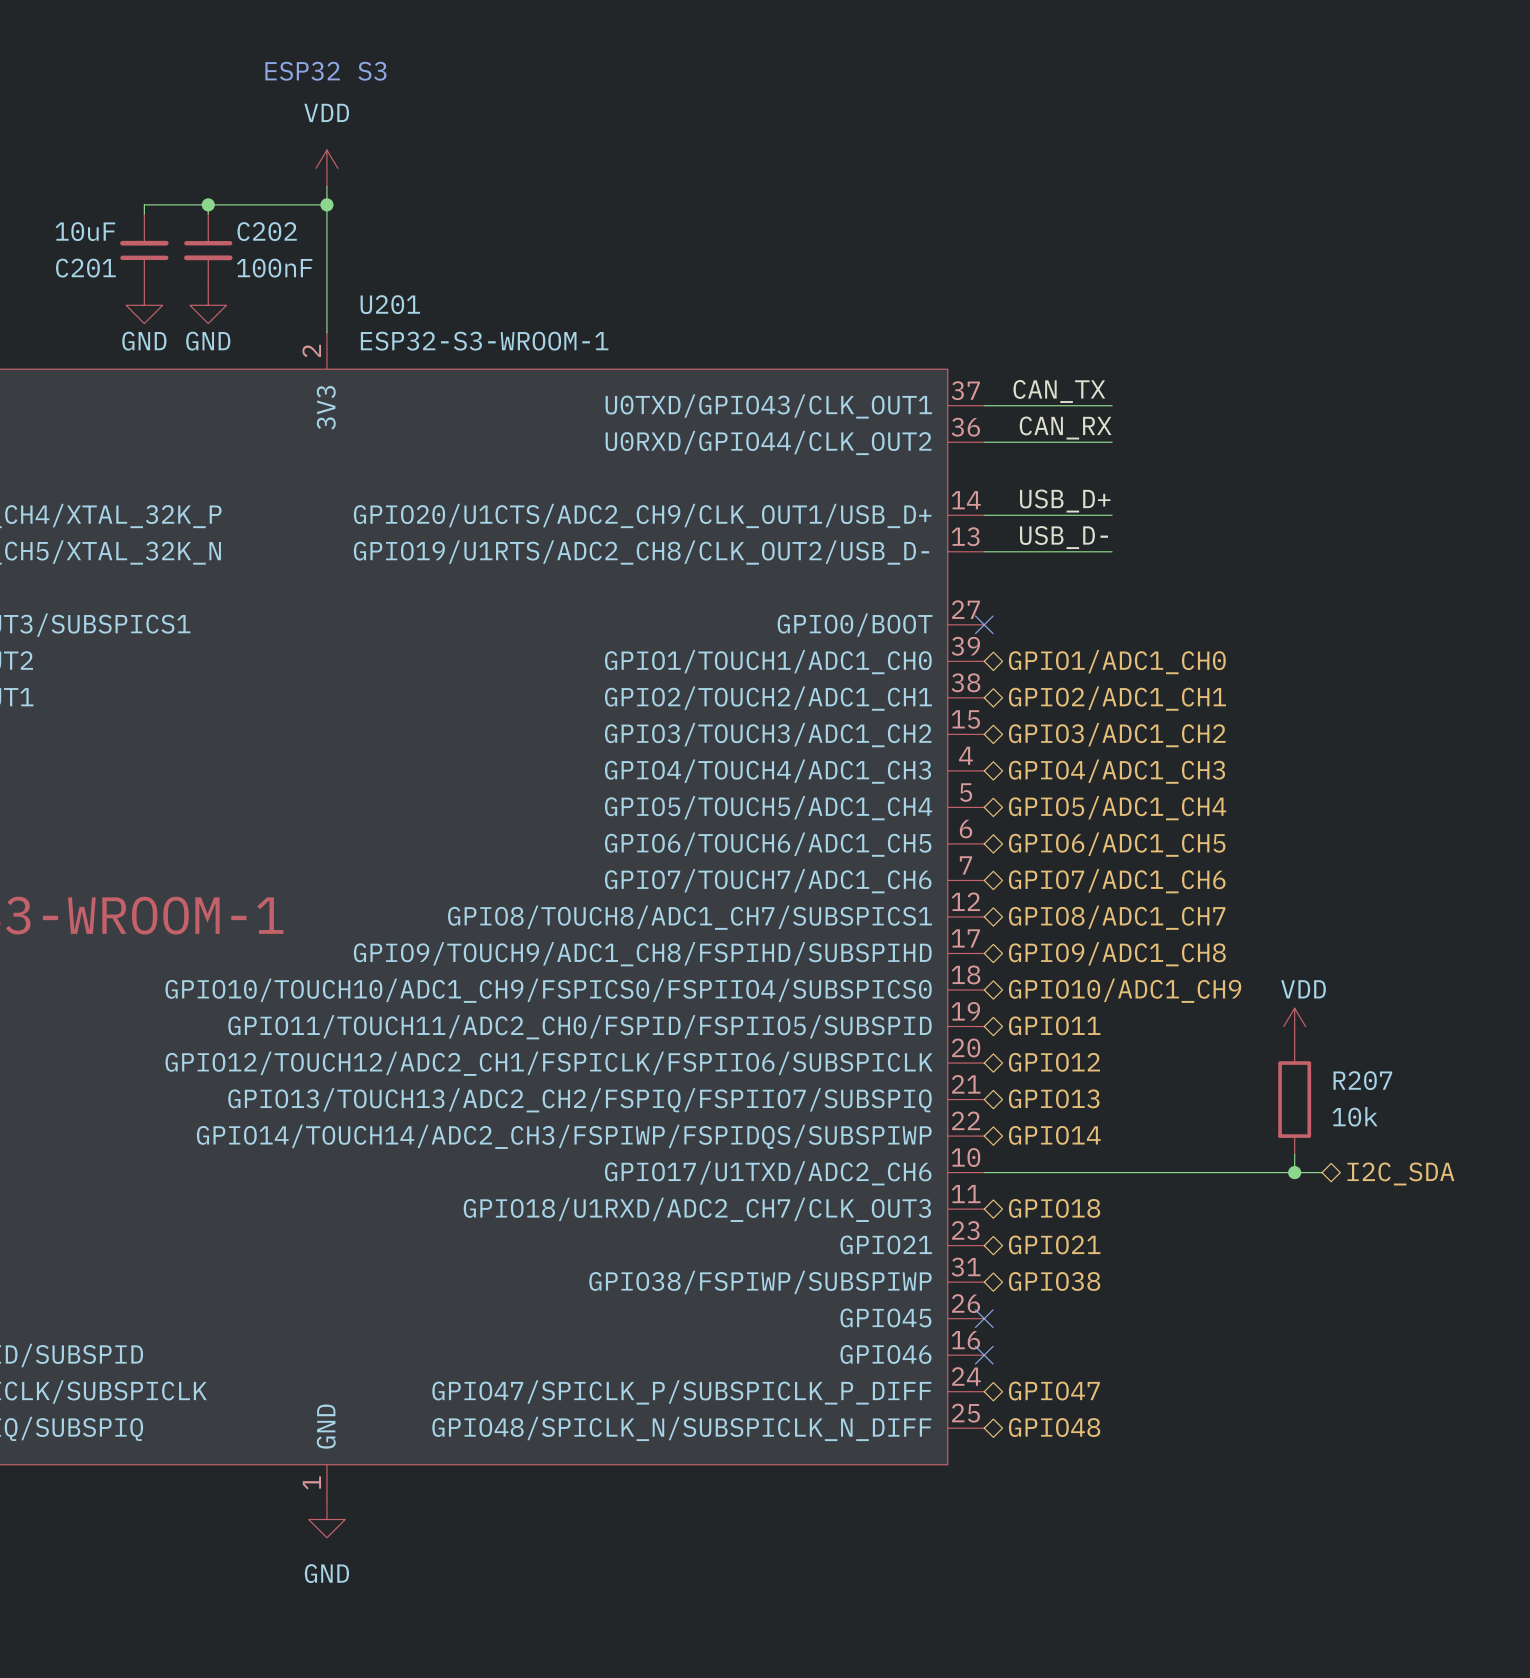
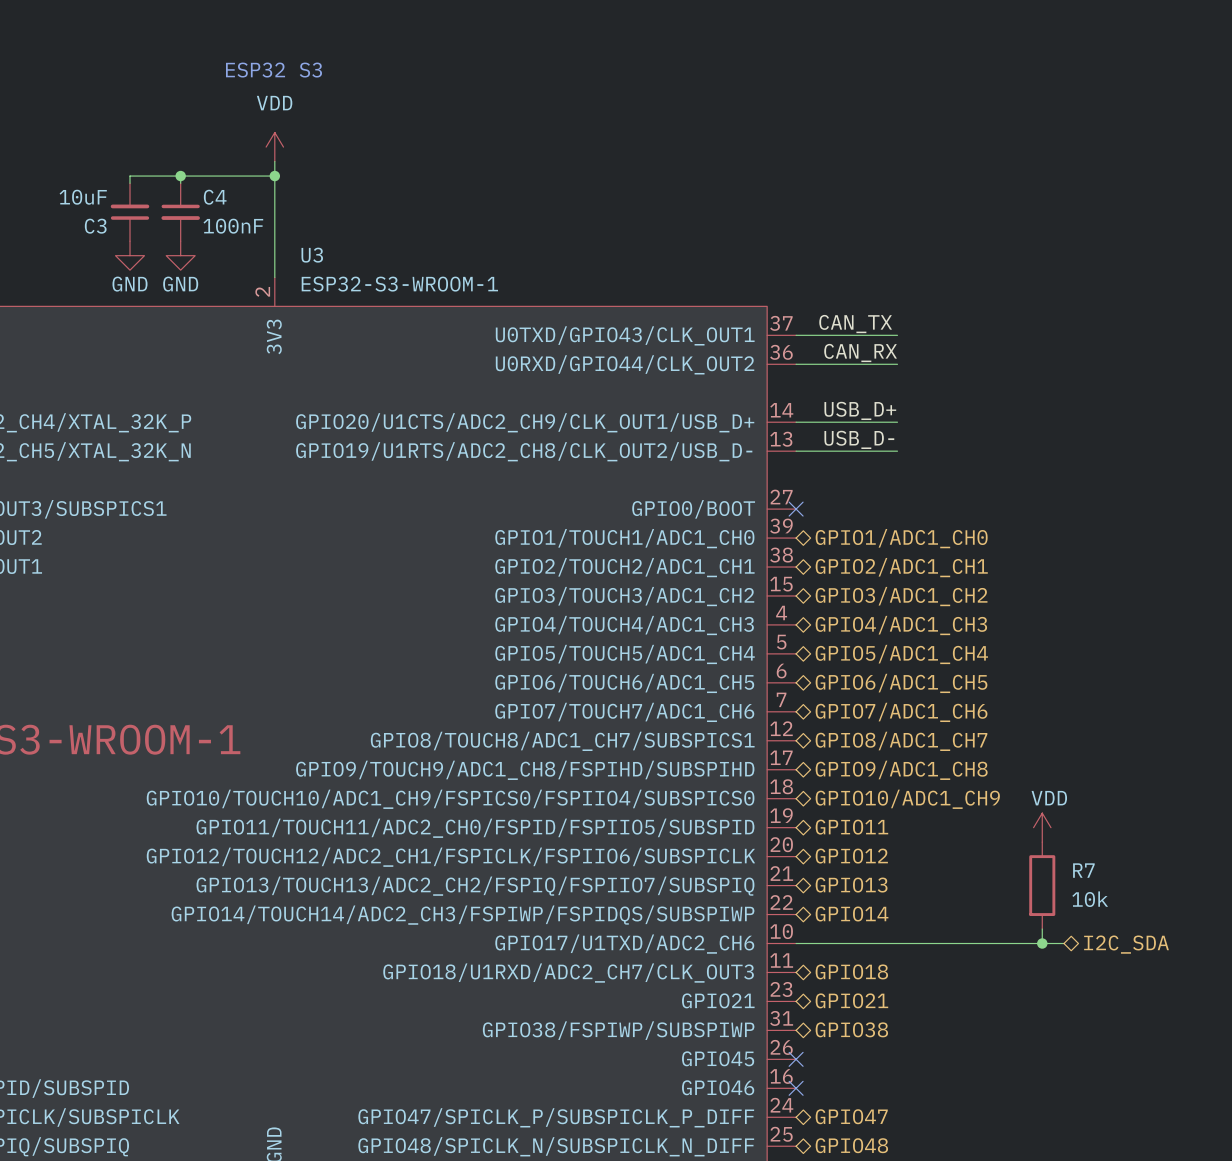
C202 name: C202 (267, 231) -> C4 (215, 197)
C201 name: C201 (85, 268) -> C3 (95, 226)
U201 name: U201 (390, 304) -> U3 (312, 255)
R207 name: R207 (1362, 1080) -> R7 (1083, 870)

